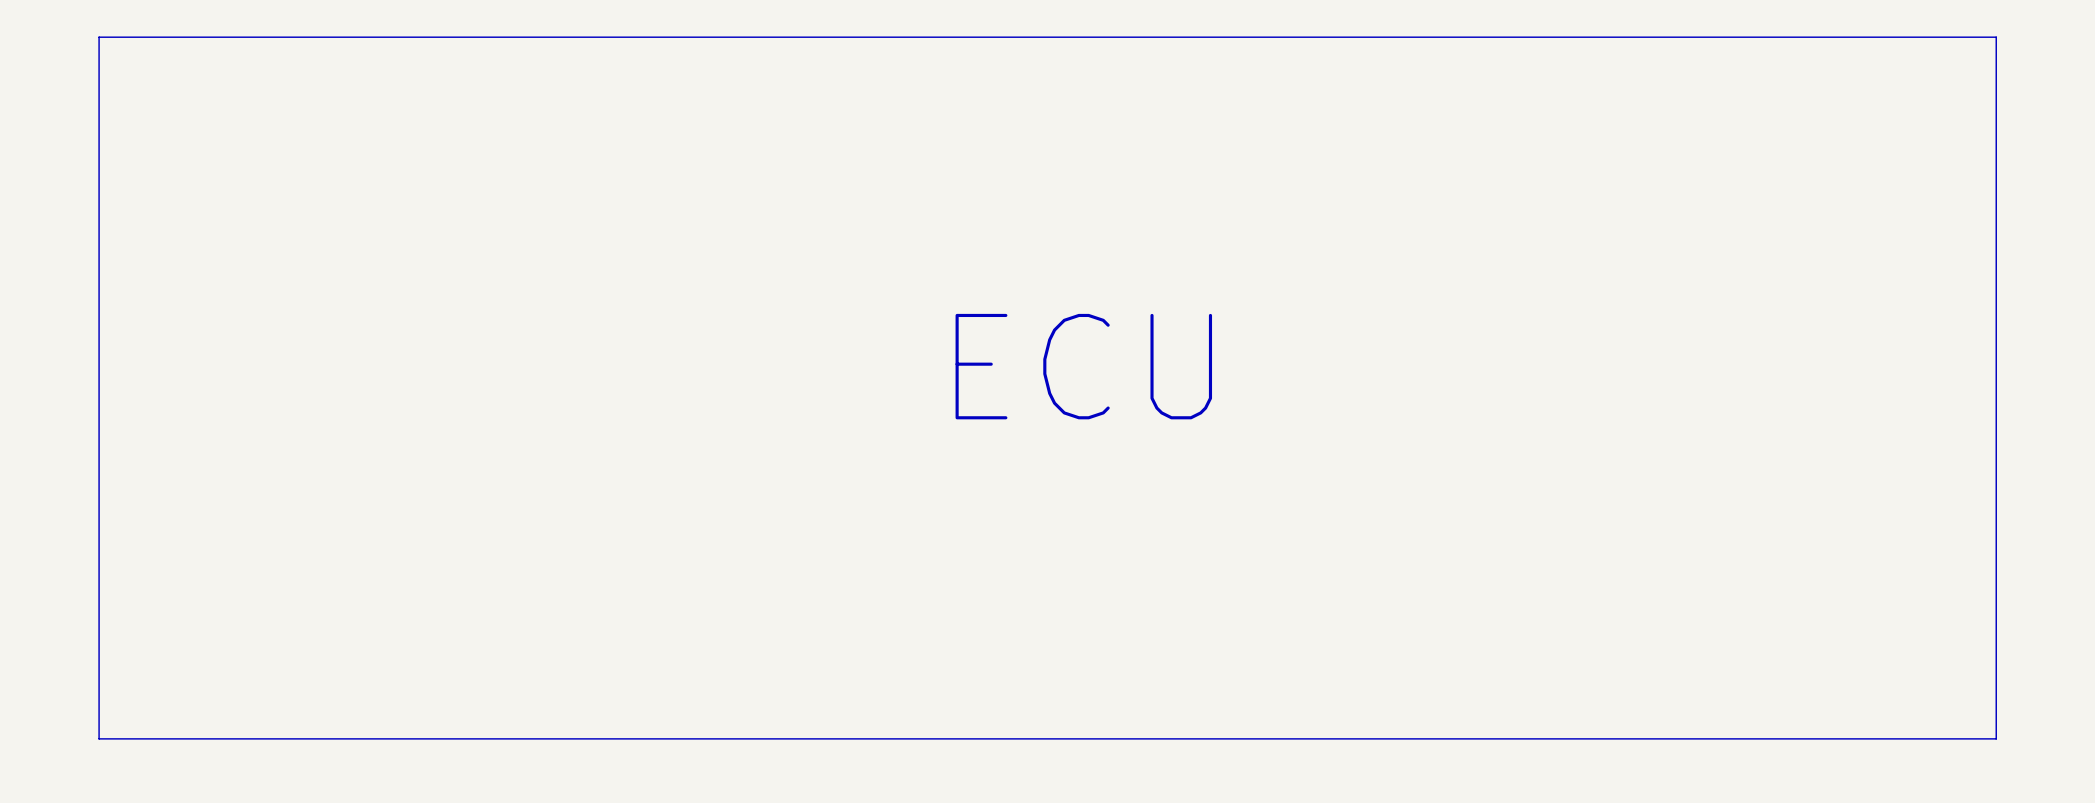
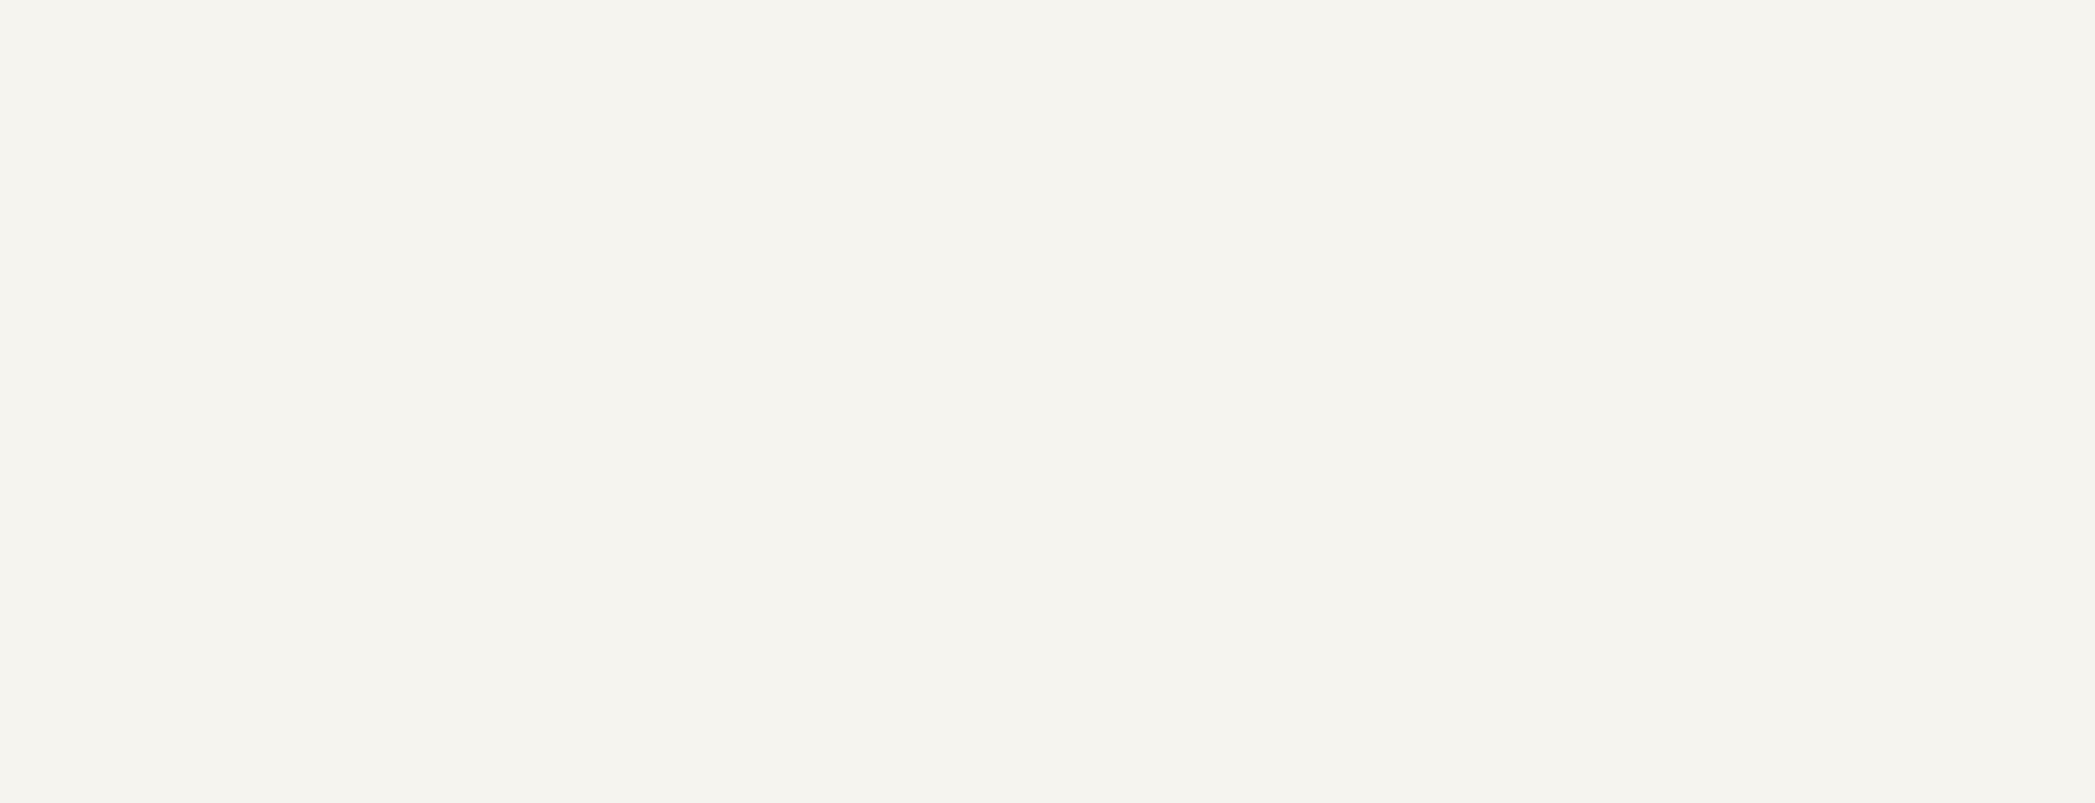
line: (99, 37) (99, 738) (1996, 738) (1996, 37) (99, 37) -> none
text: ECU (1083, 366) -> none

